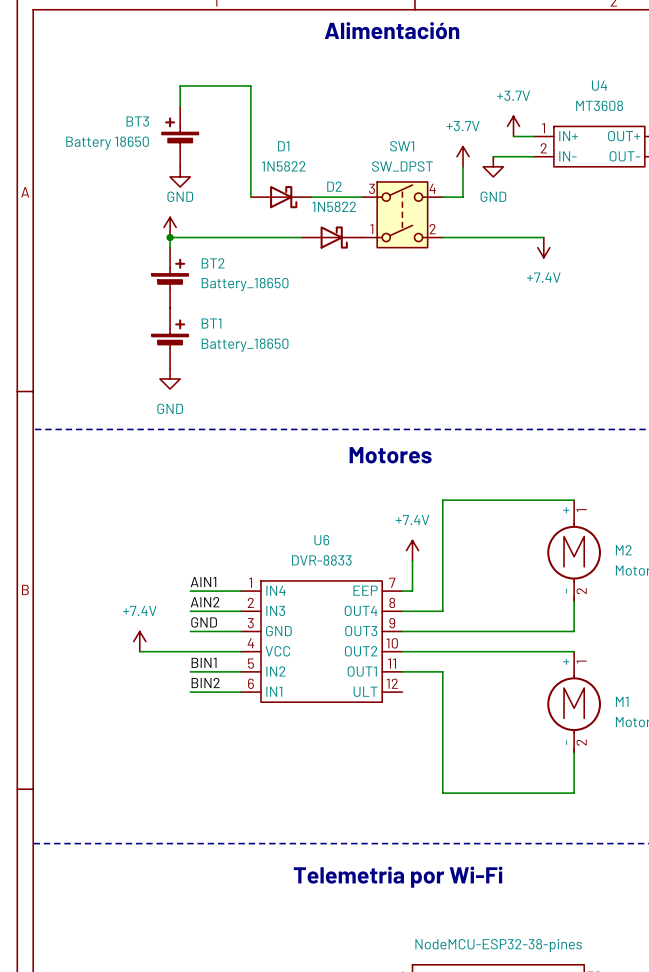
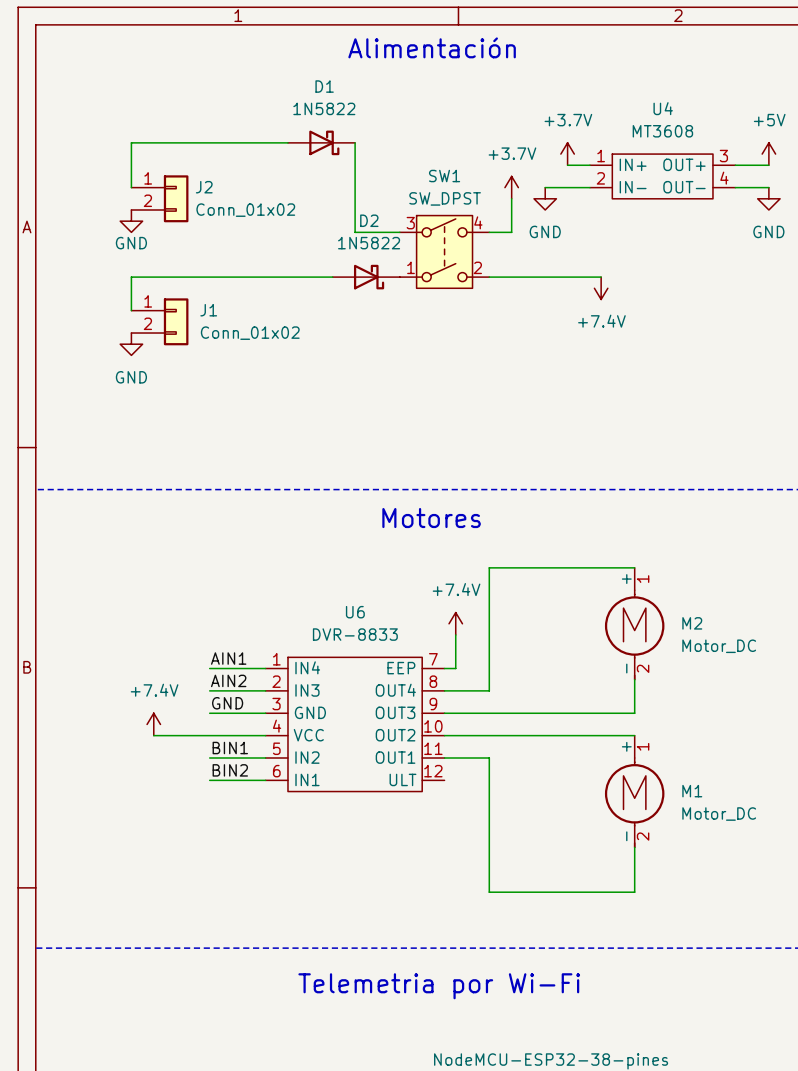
wire: (180, 106) (180, 86) (250, 86) (250, 197) -> none
wire: none -> (287, 142) (131, 142) (131, 187)
BT3: Battery 18650 (180, 136) -> none
J2: none -> Conn_01x02 (159, 198)
power symbol position: GND (180, 176) -> GND (131, 221)
D1 position: (281, 197) -> (321, 142)
wire: (311, 197) (321, 197) -> (355, 142) (355, 232)
power symbol: (170, 227) -> none
wire: (170, 237) (170, 247) -> (187, 277) (131, 277) (131, 310)
junction: (170, 237) -> none
J1: none -> Conn_01x02 (159, 321)
BT2: Battery_18650 (170, 277) -> none
power symbol: none -> GND (131, 344)
BT1: Battery_18650 (170, 338) -> none
power symbol: GND (170, 378) -> none

